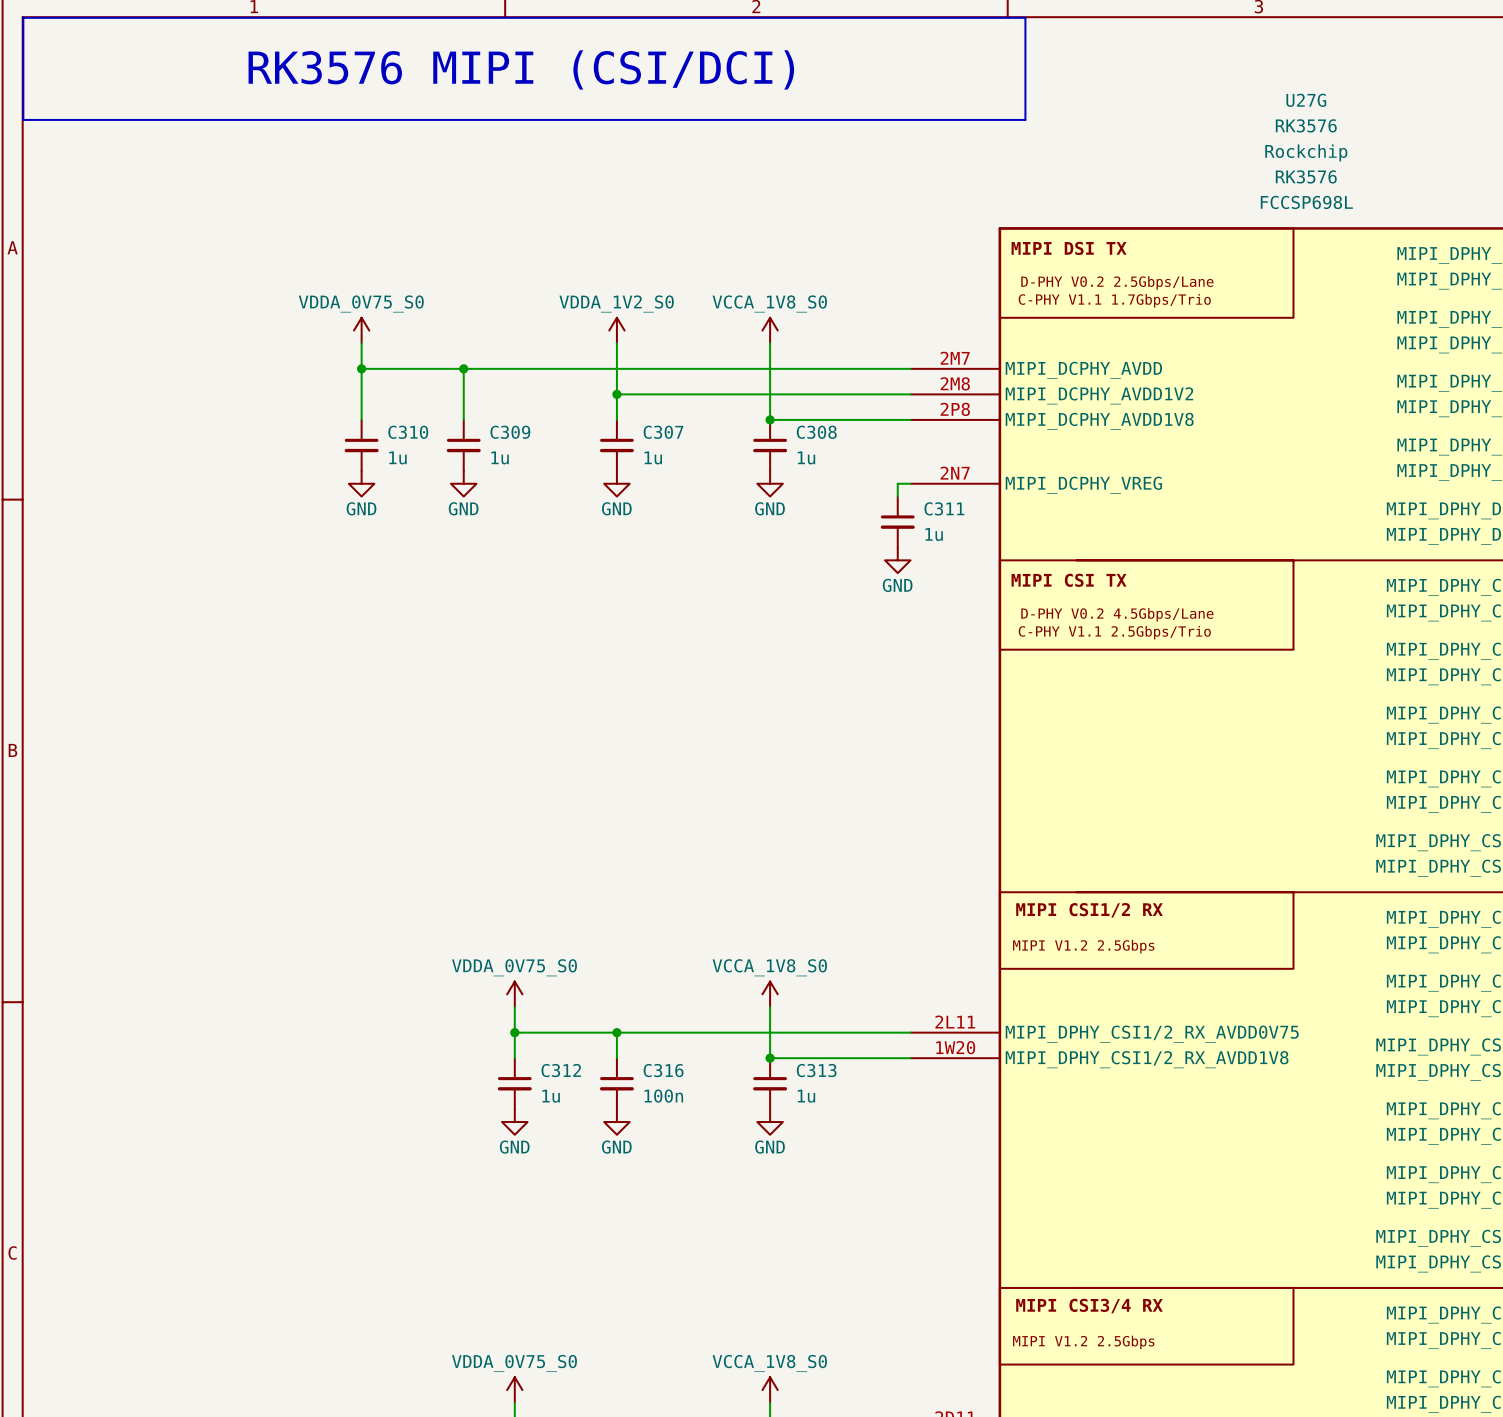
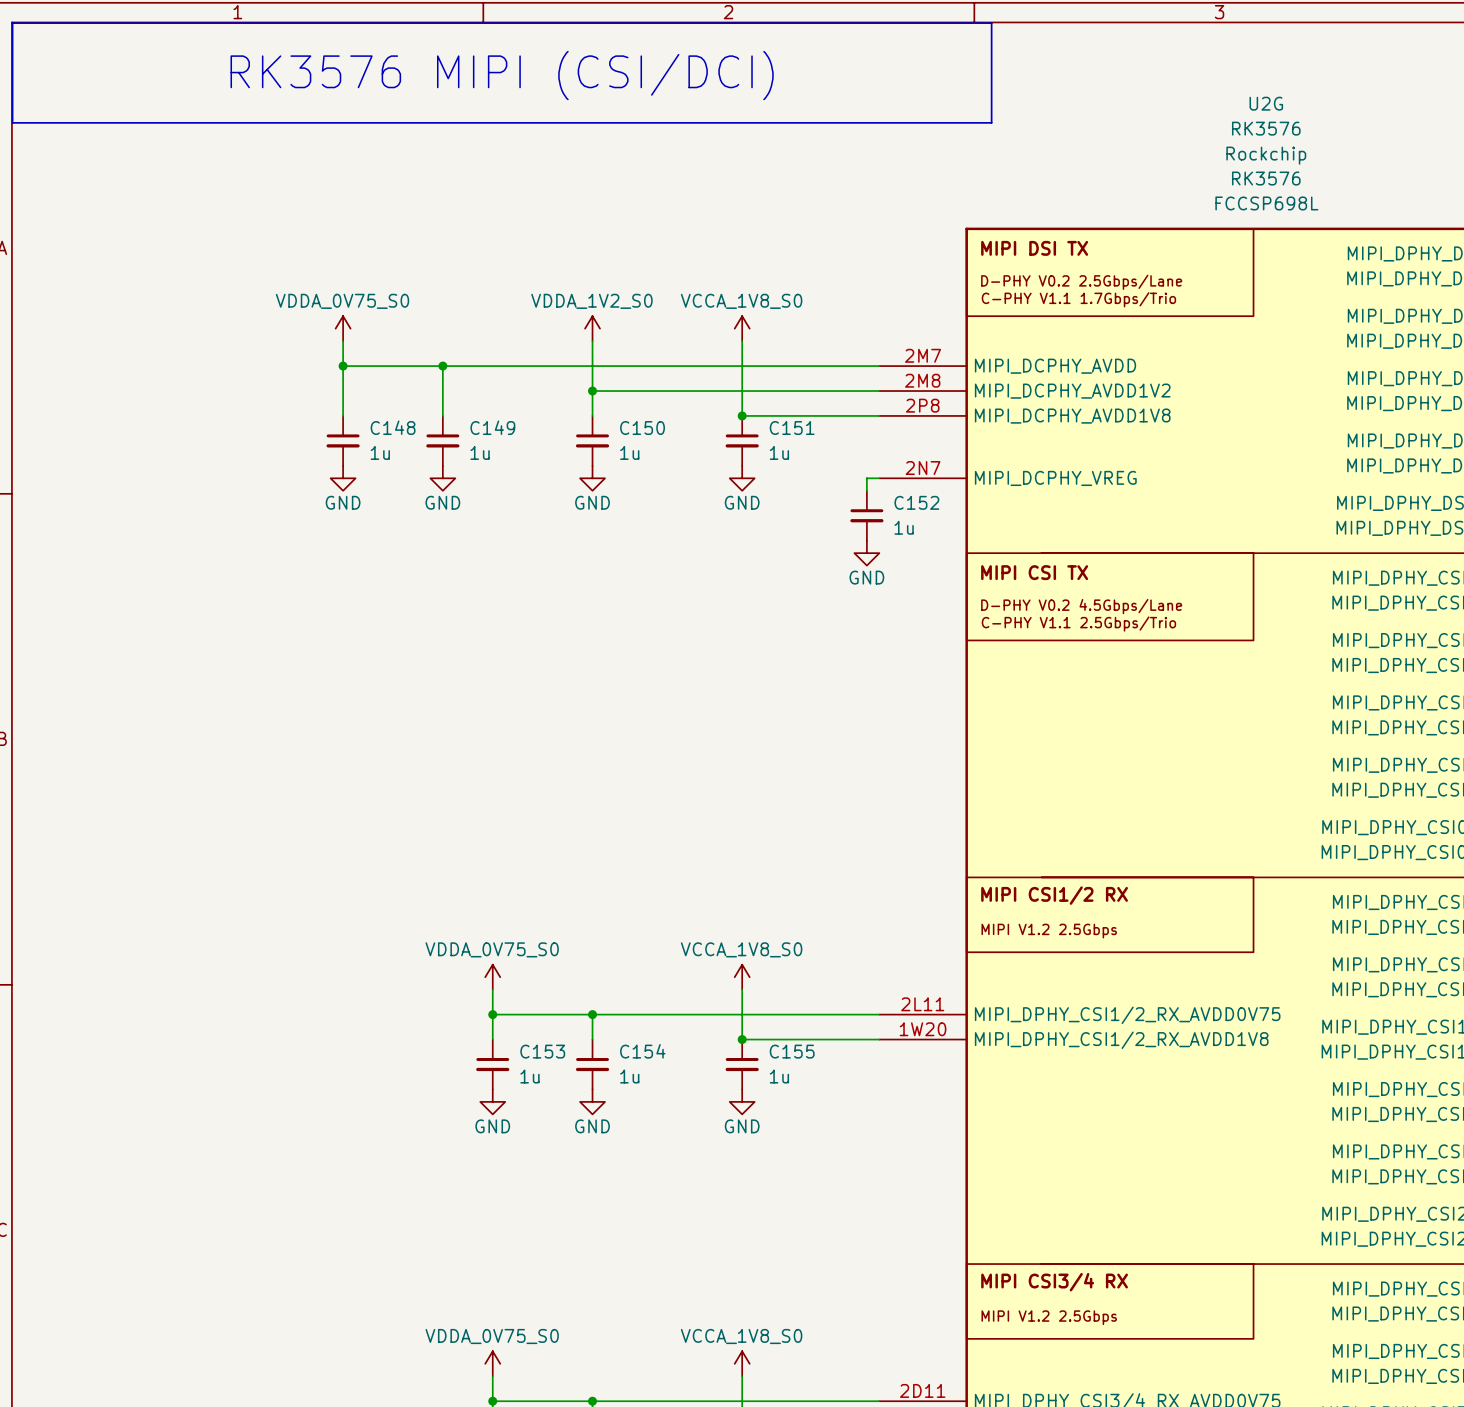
U27G name: U27G (1306, 100) -> U2G (1266, 103)
C310 name: C310 (408, 432) -> C148 (393, 427)
C309 name: C309 (510, 432) -> C149 (492, 427)
C307 name: C307 (663, 432) -> C150 (642, 428)
C308 name: C308 (816, 432) -> C151 (792, 428)
C311 name: C311 (944, 508) -> C152 (916, 502)
C312 name: C312 (561, 1070) -> C153 (542, 1051)
C316 name: C316 (663, 1070) -> C154 (642, 1051)
C313 name: C313 (816, 1070) -> C155 (792, 1051)
C316 value: 100n (663, 1096) -> 1u (629, 1076)

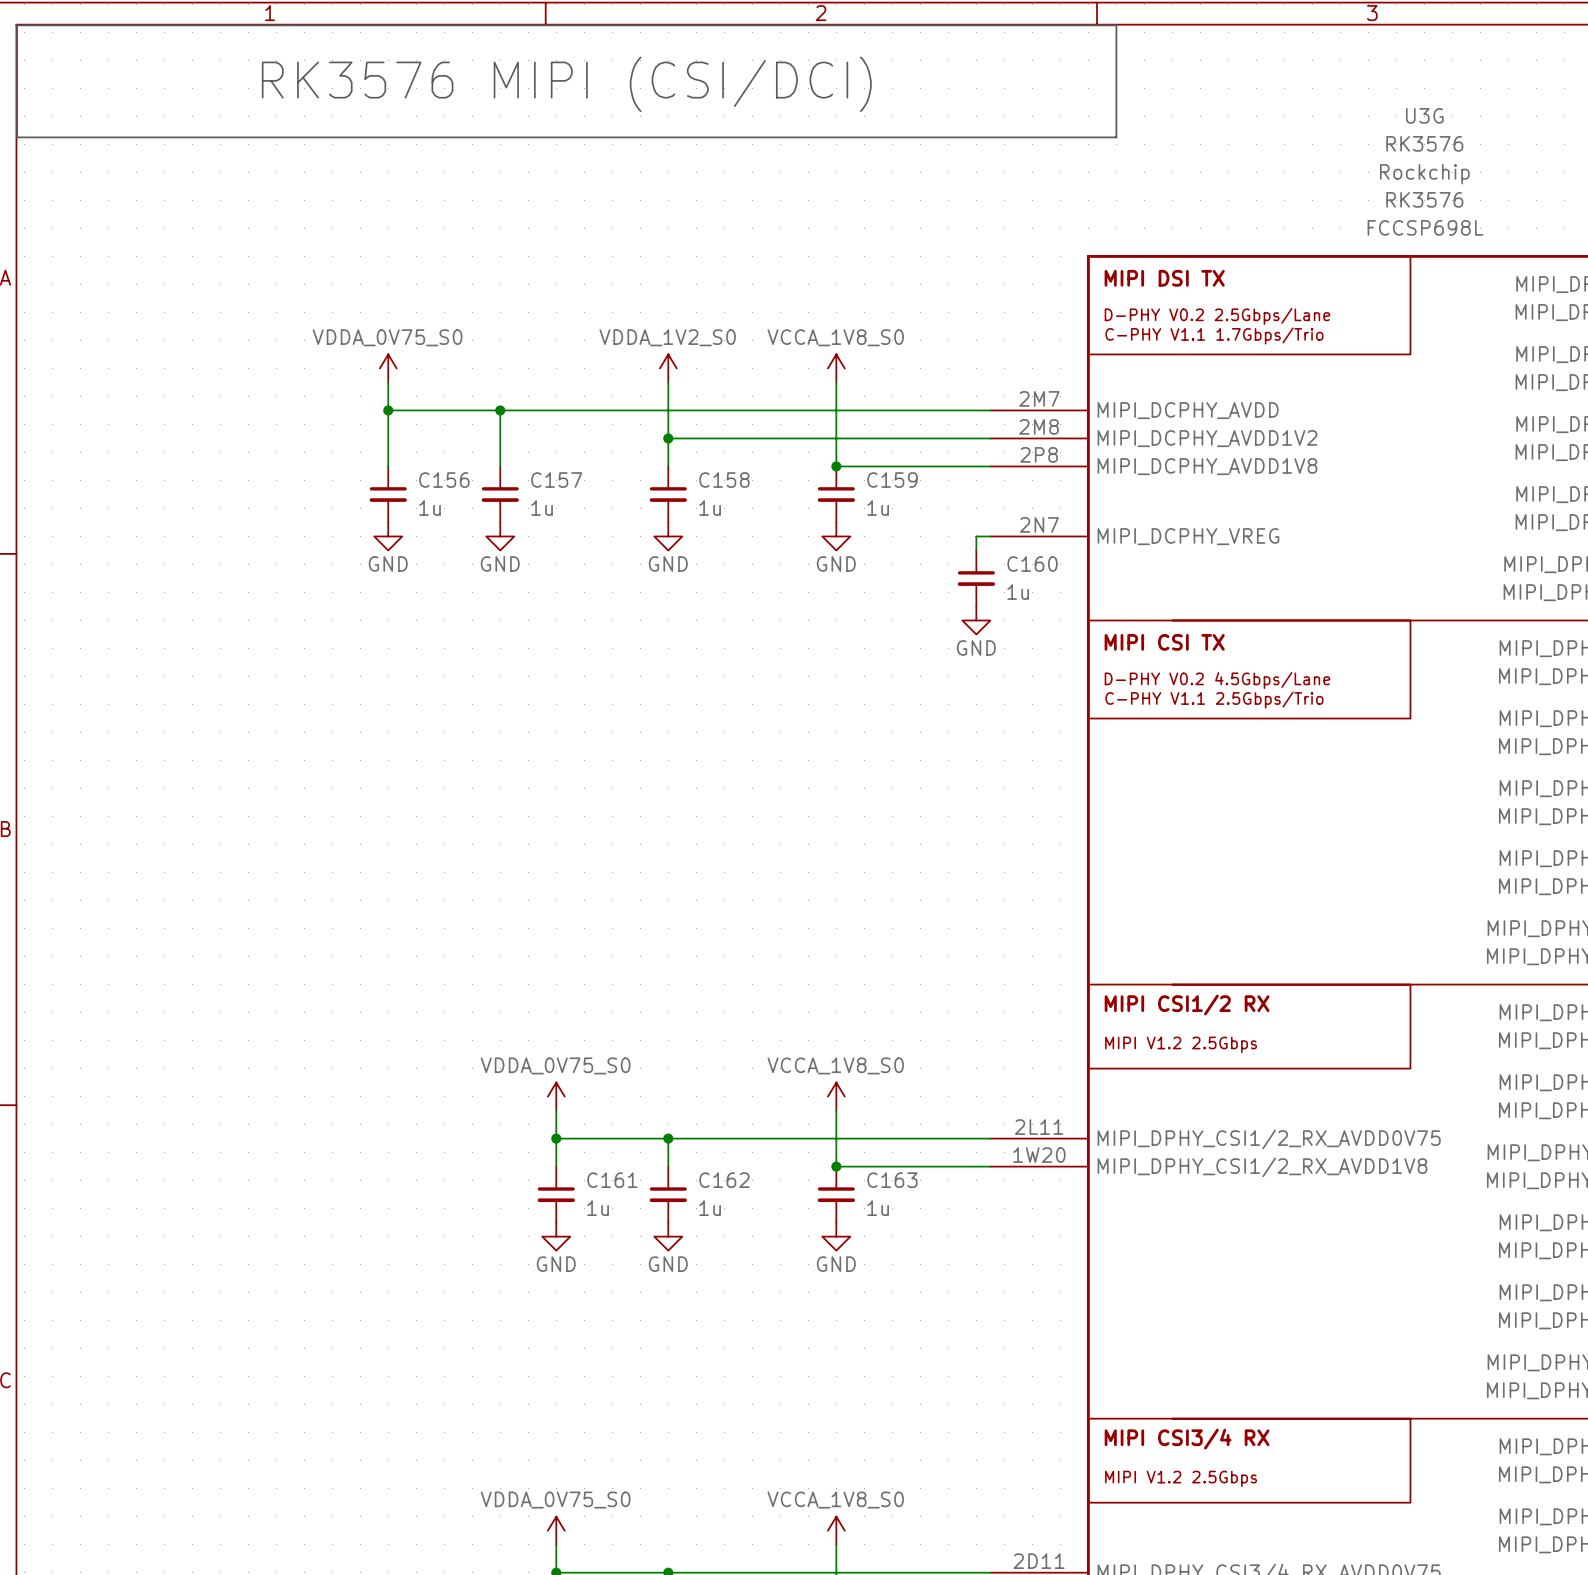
U2G name: U2G (1266, 103) -> U3G (1424, 115)
C148 name: C148 (393, 427) -> C156 (444, 480)
C149 name: C149 (492, 427) -> C157 (556, 480)
C150 name: C150 (642, 428) -> C158 (724, 480)
C151 name: C151 (792, 428) -> C159 (892, 480)
C152 name: C152 (916, 502) -> C160 (1032, 564)
C153 name: C153 (542, 1051) -> C161 (612, 1180)
C154 name: C154 (642, 1051) -> C162 (724, 1180)
C155 name: C155 (792, 1051) -> C163 (892, 1180)

